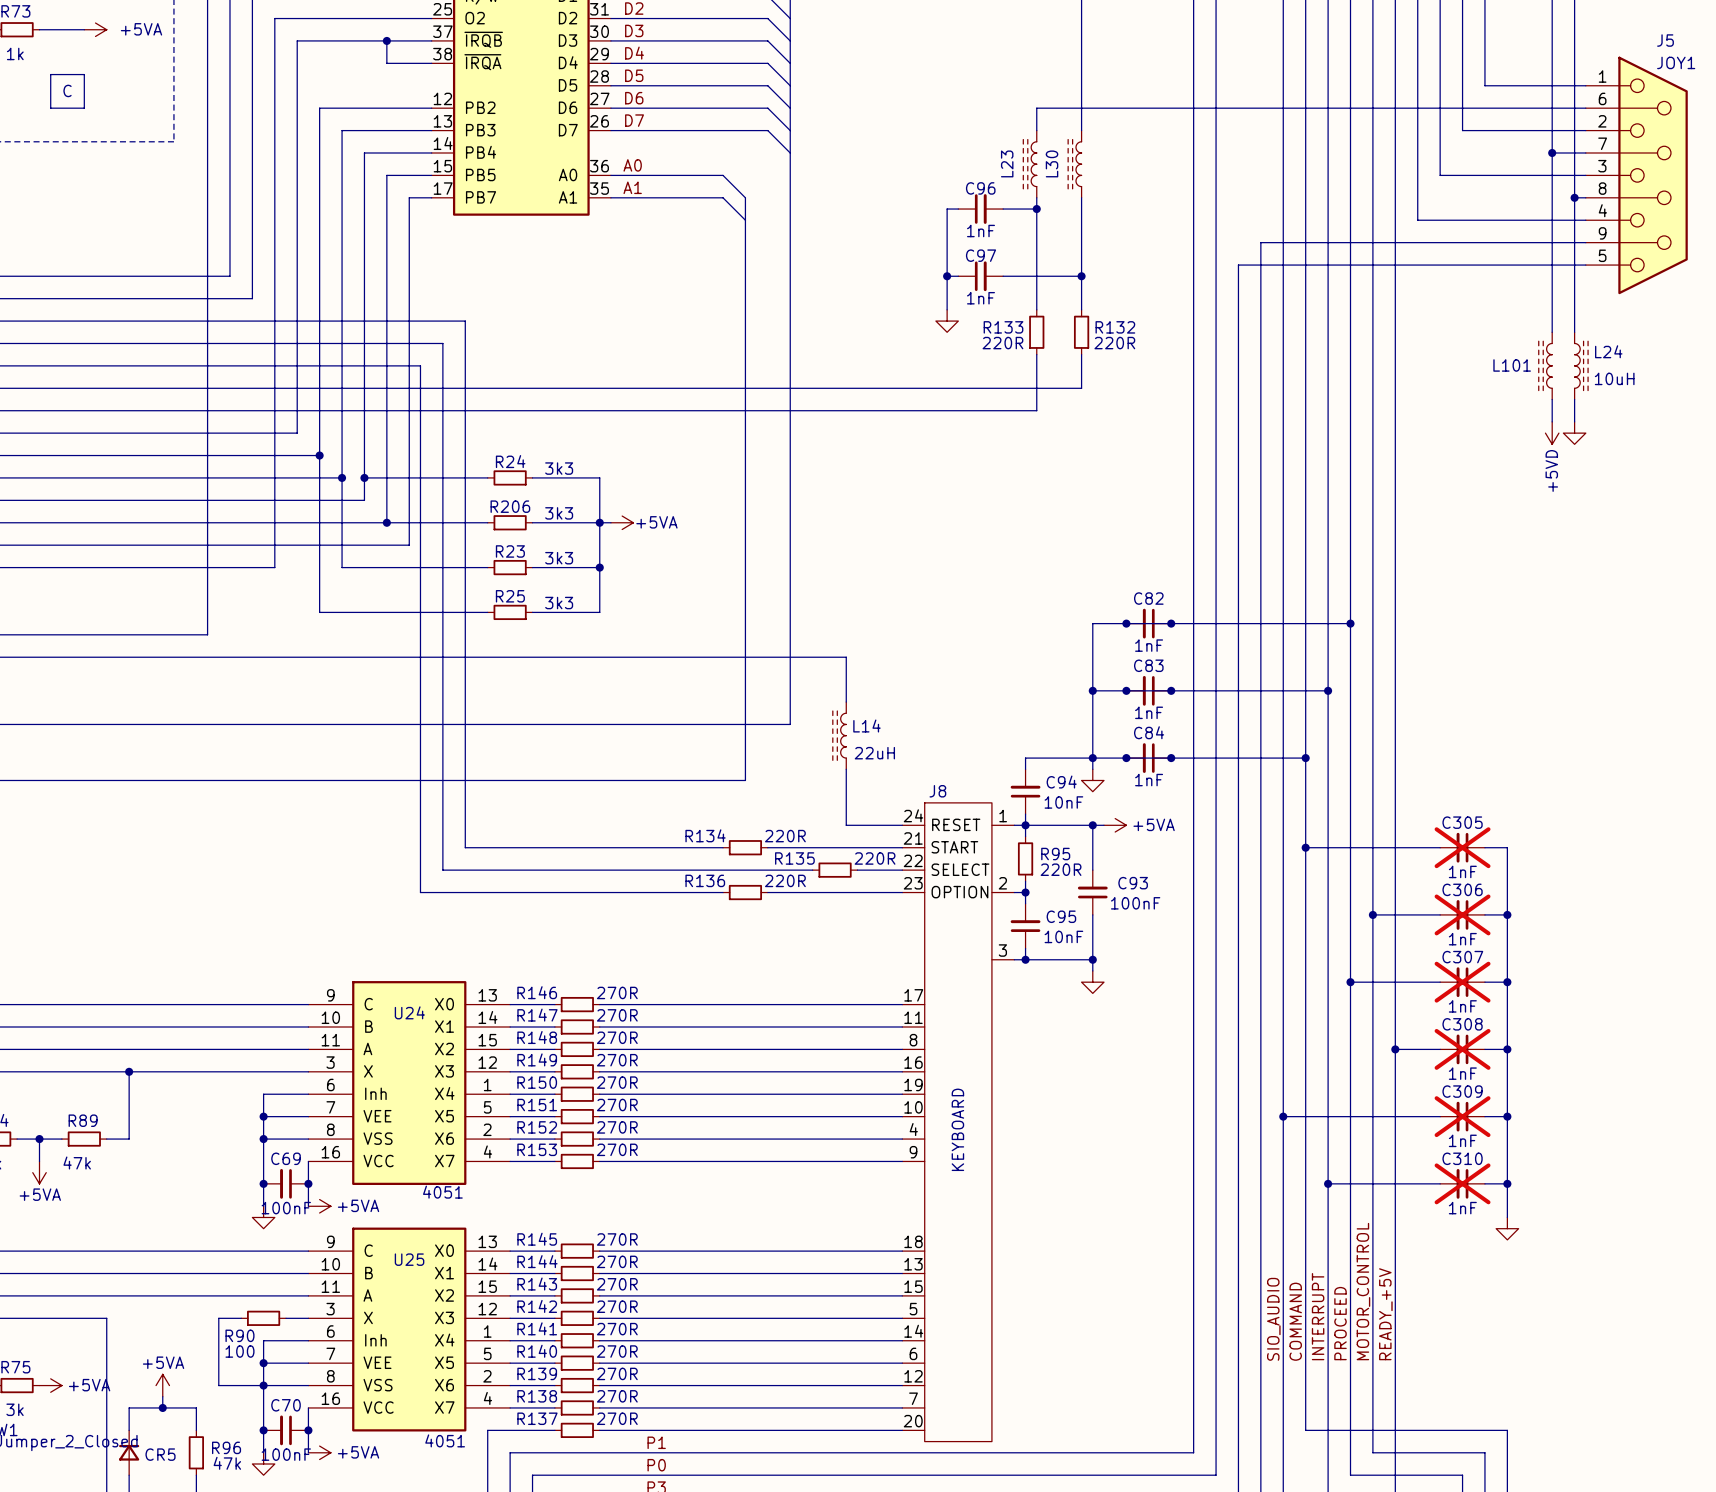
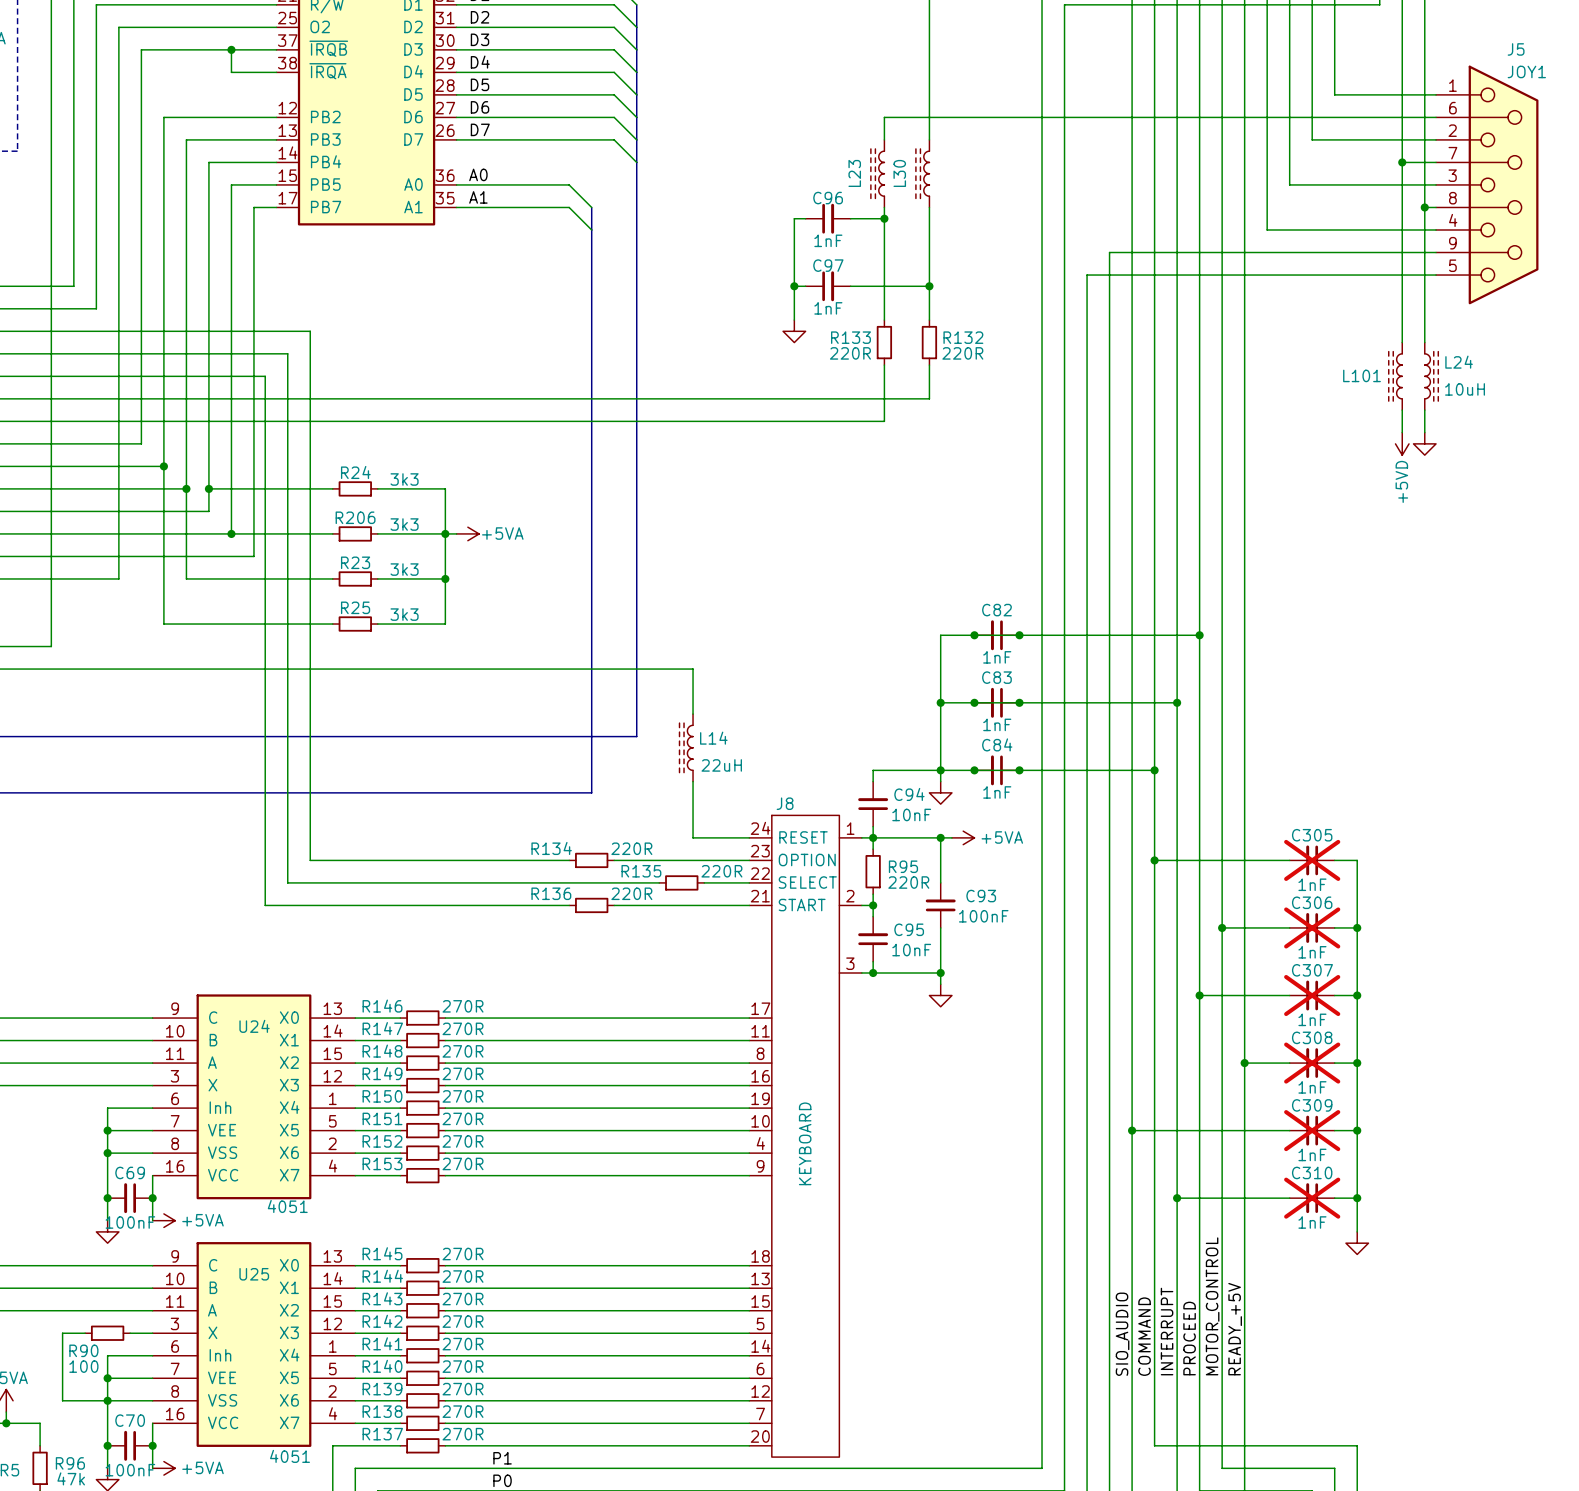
J8 pin number: 21 (913, 838) -> 23 (760, 851)
J8 pin name: START (954, 847) -> OPTION (807, 860)
J8 pin number: 23 (913, 883) -> 21 (760, 896)
J8 pin name: OPTION (959, 892) -> START (802, 905)

